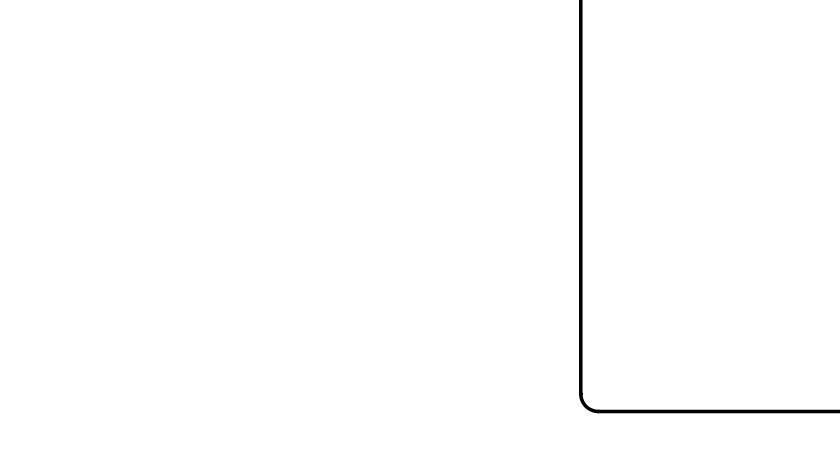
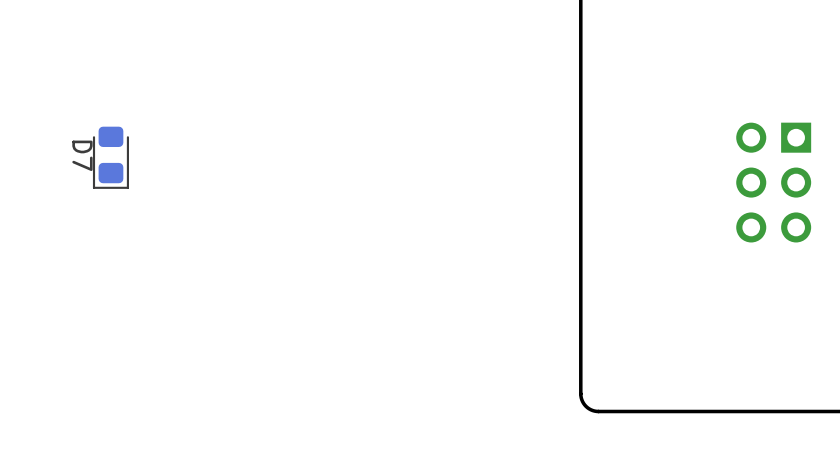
D7: none -> (110, 157)
part: none -> (773, 182)

